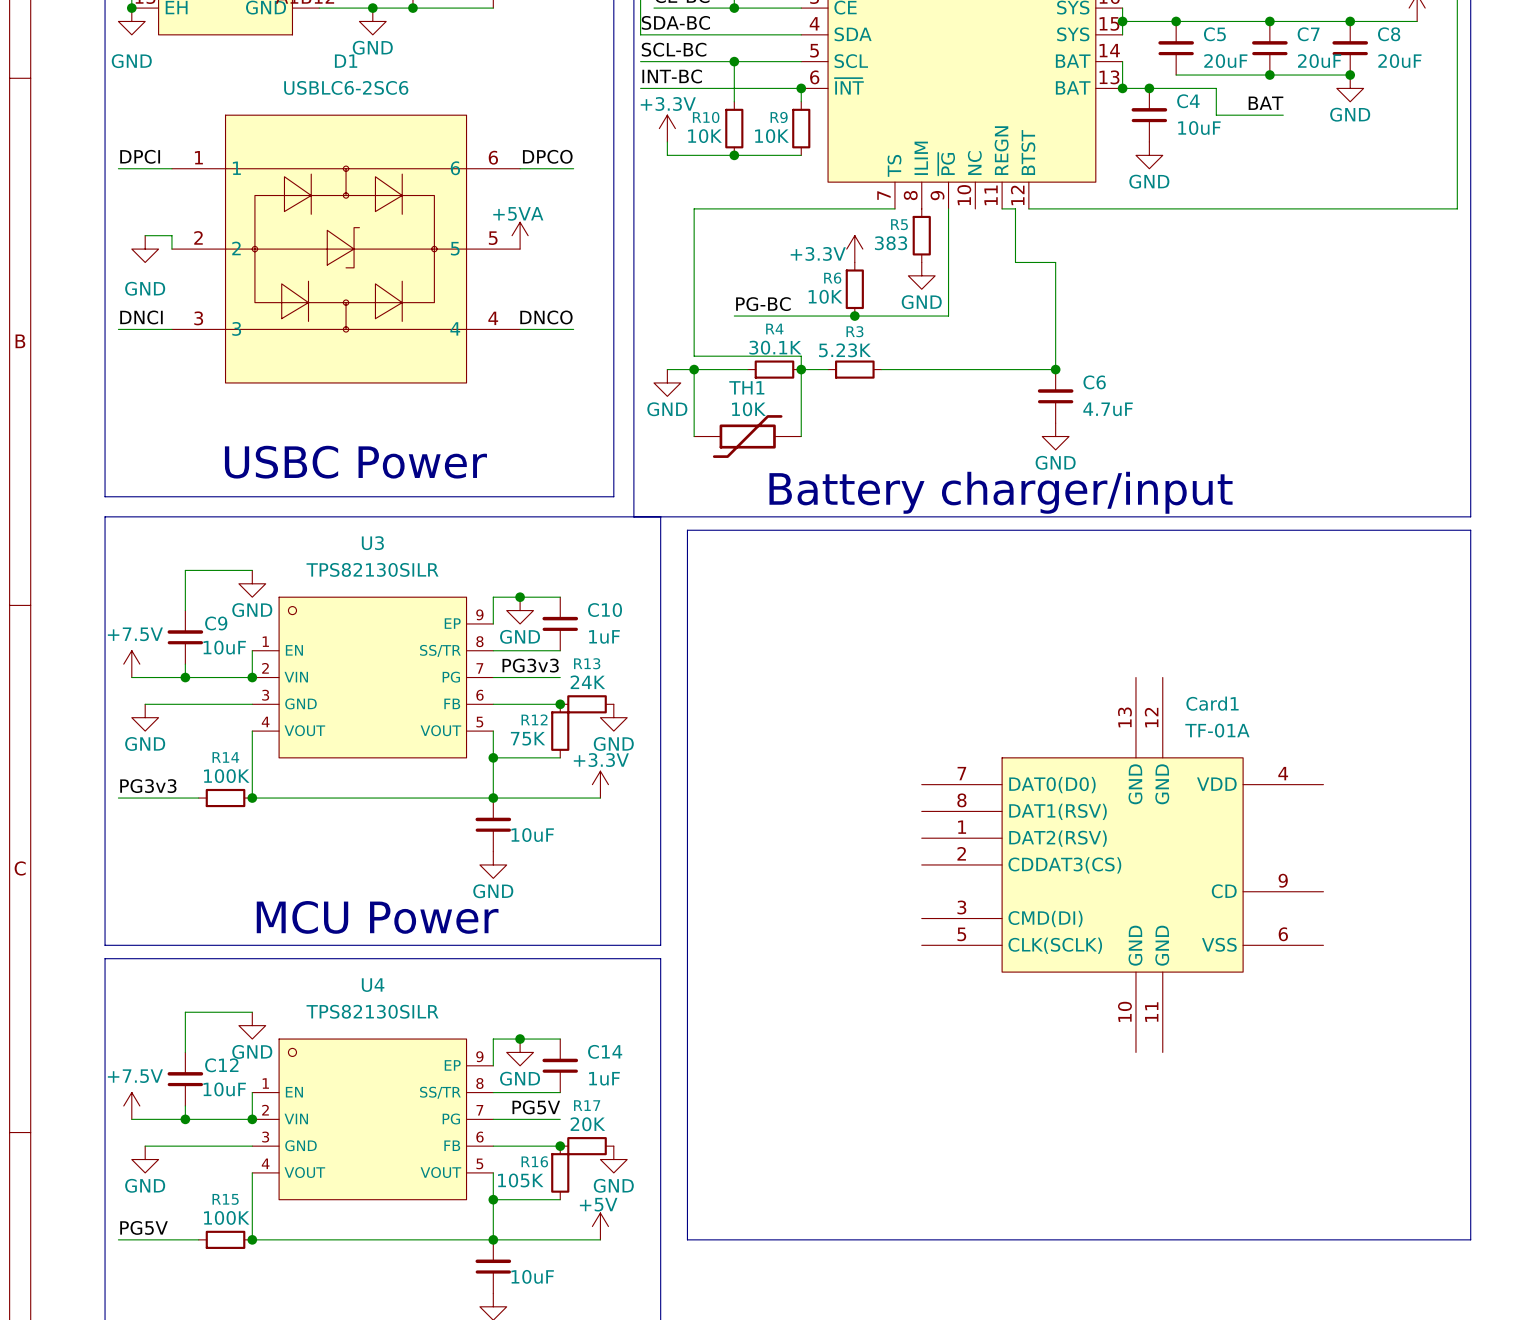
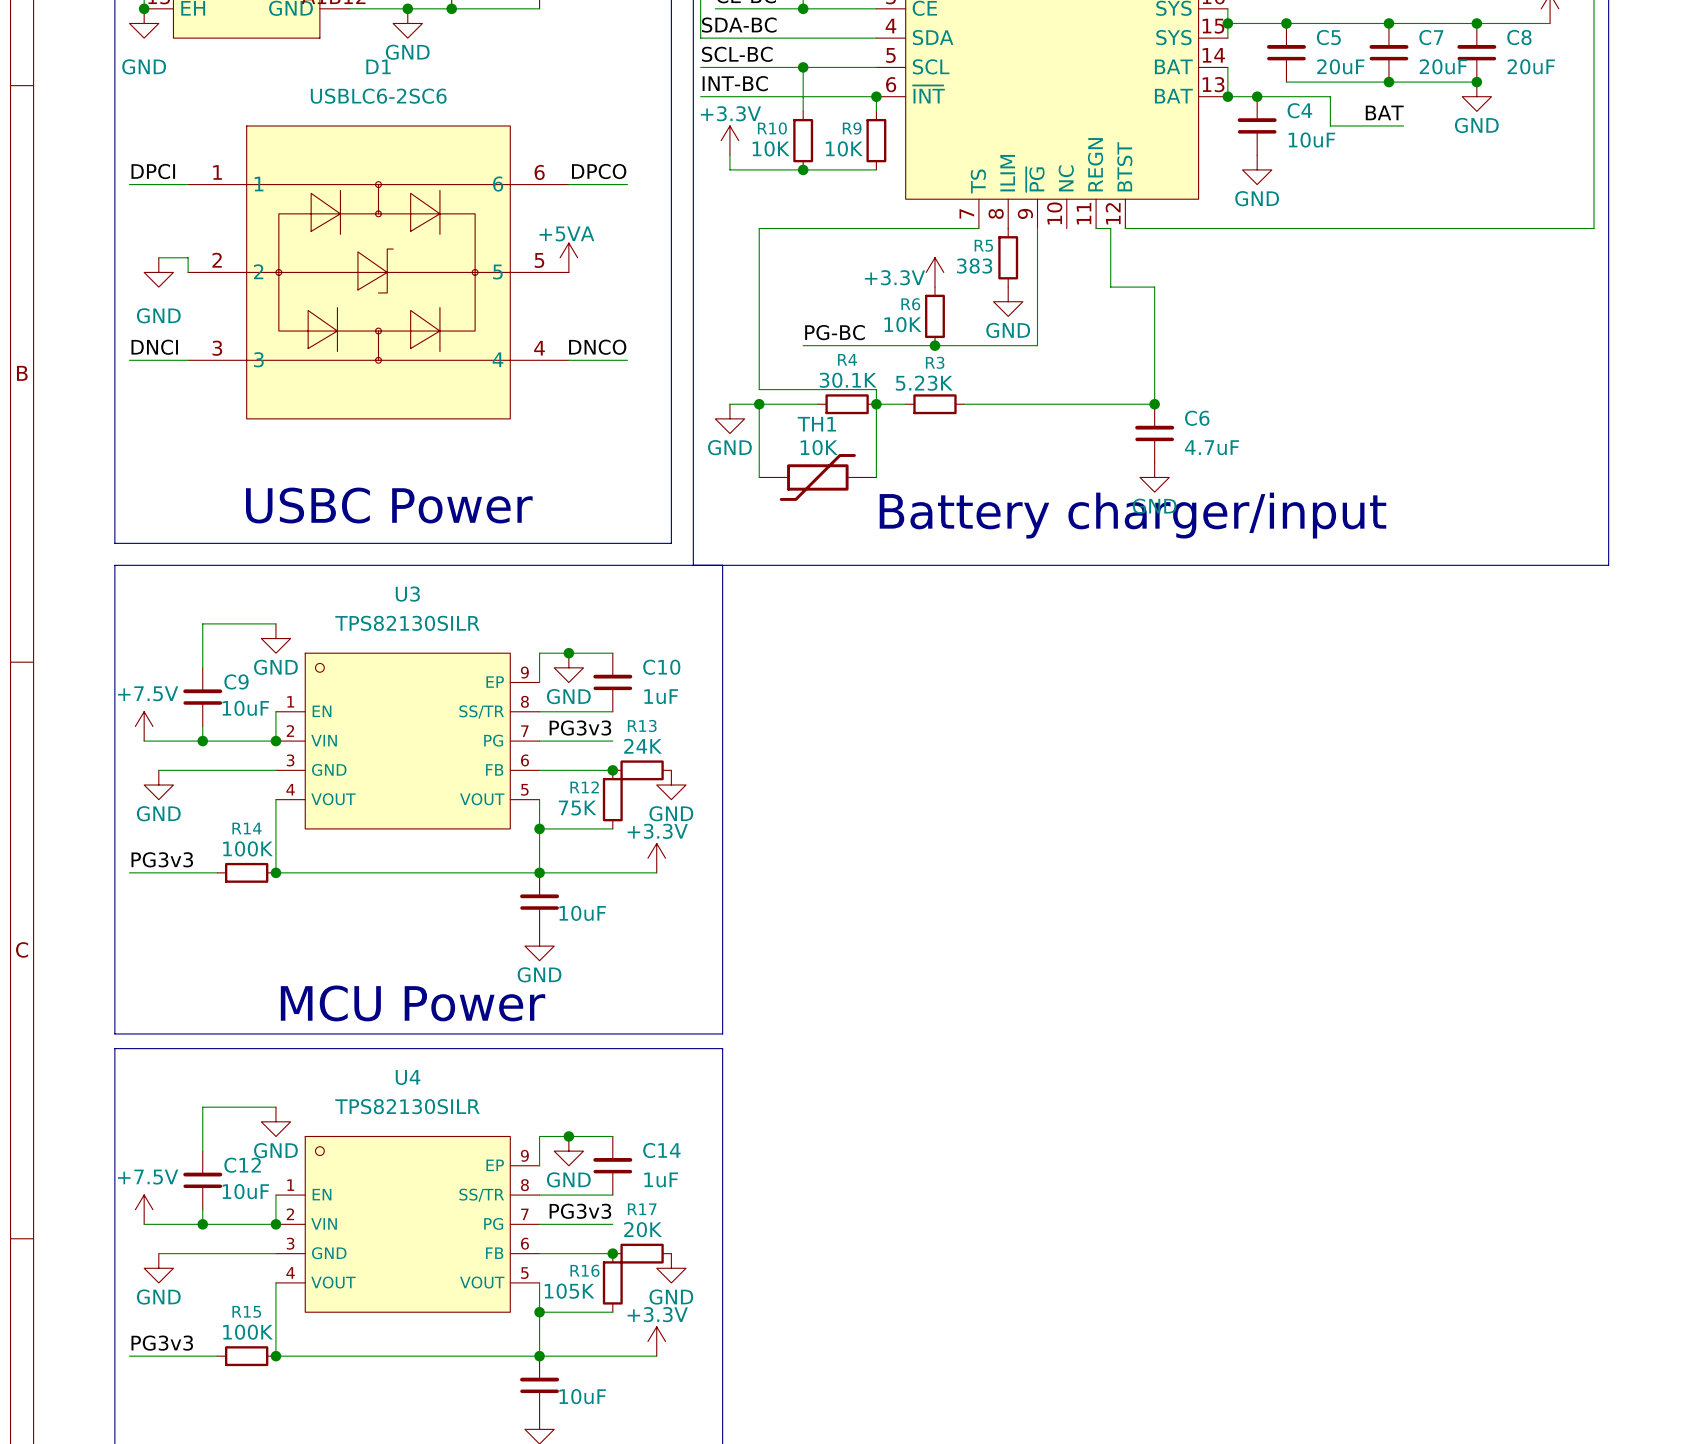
text position: Battery charger/input (1001, 492) -> Battery charger/input (1132, 515)
line: (687, 530) (1470, 530) (1470, 1239) (687, 1239) (687, 530) -> none
Card1: TF-01A (1122, 864) -> none
label: PG5V (536, 1107) -> PG3v3 (580, 1211)
power symbol: +5V (600, 1226) -> +3.3V (656, 1341)
label: PG5V (144, 1227) -> PG3v3 (162, 1343)

